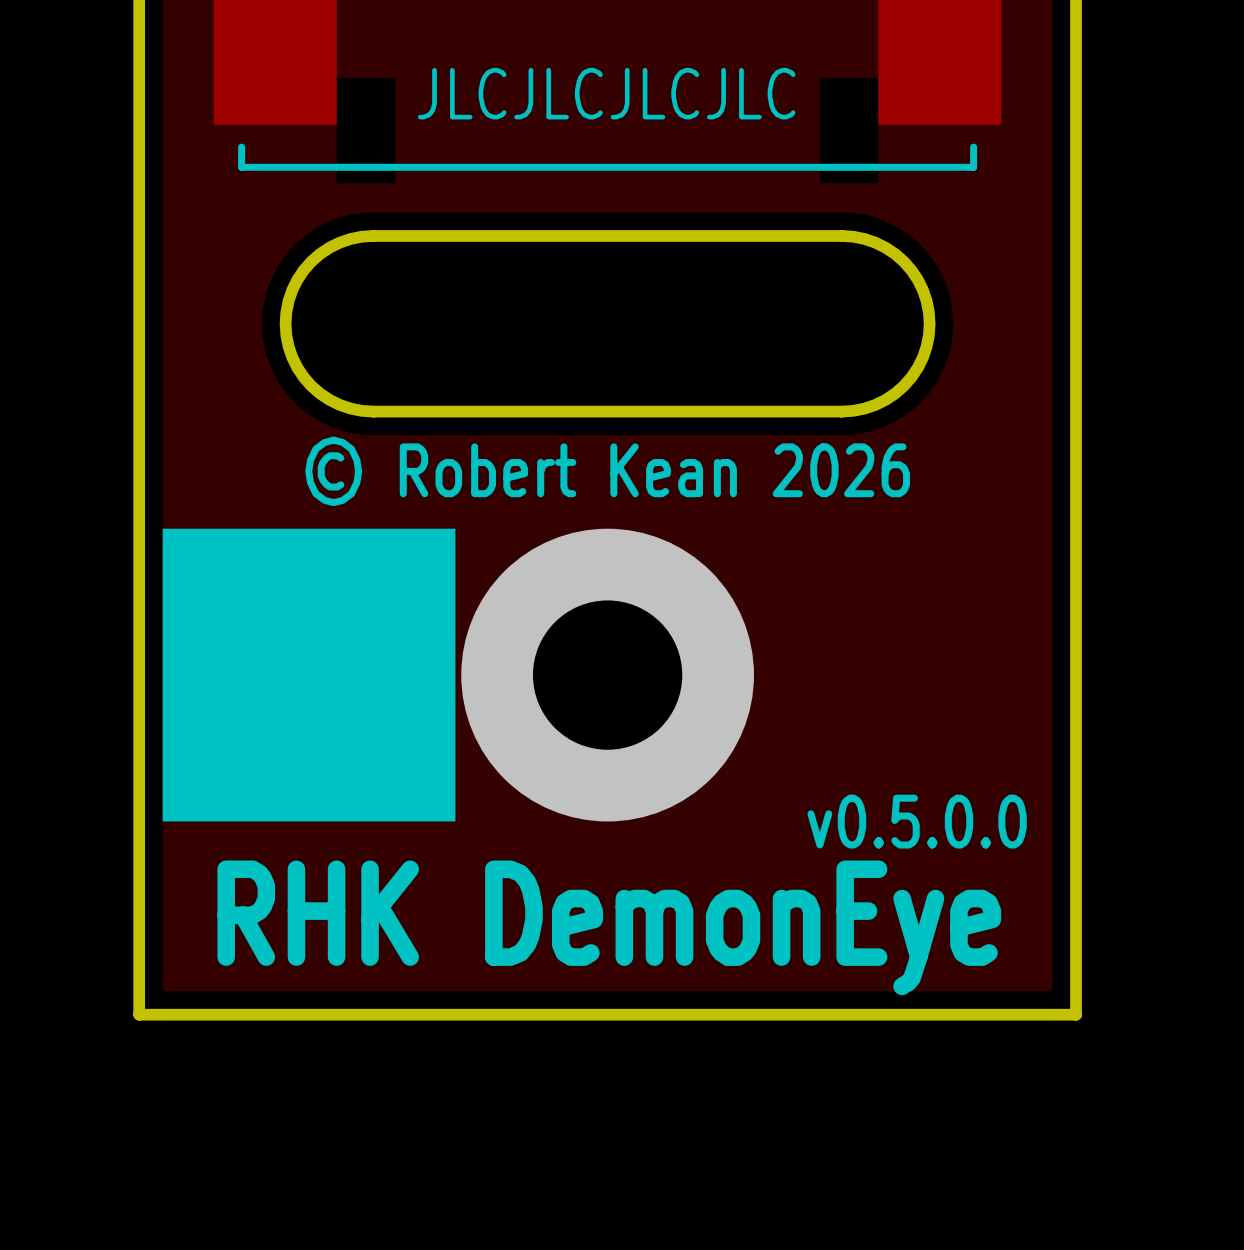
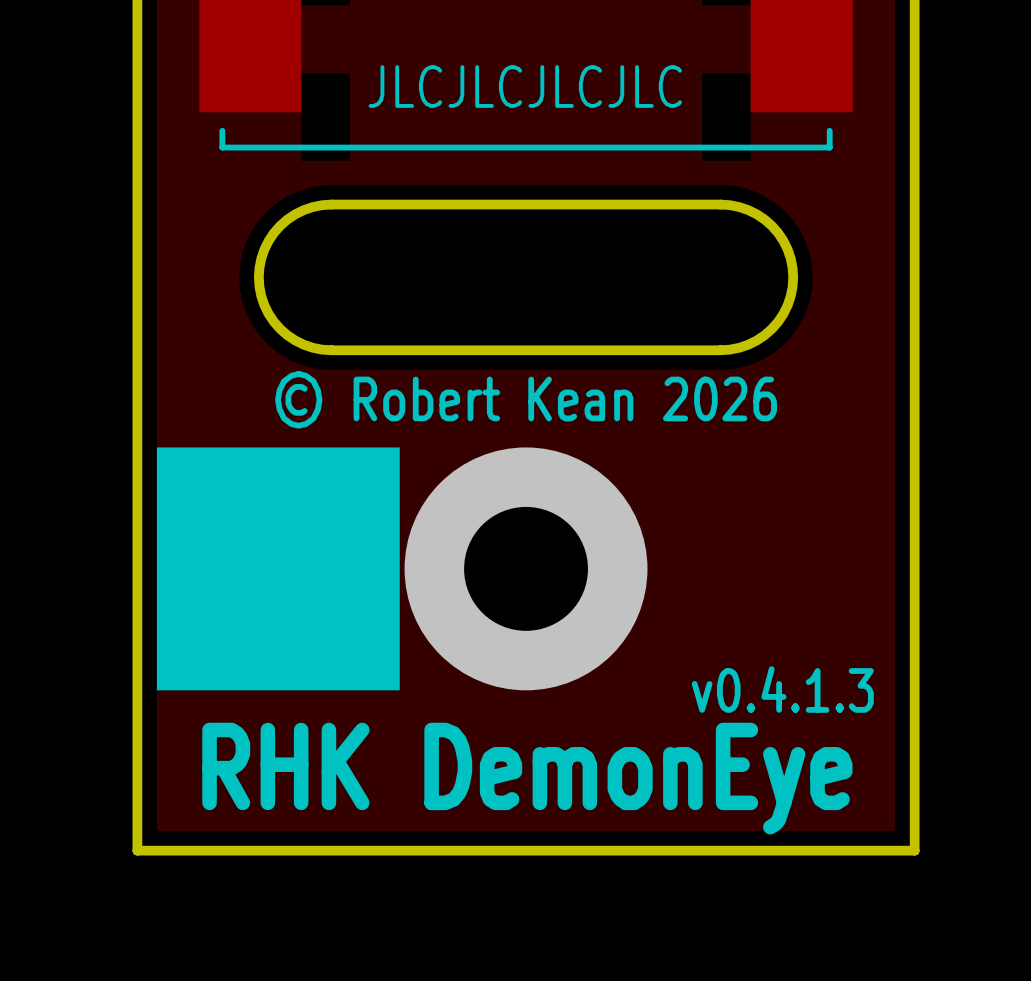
text: v0.5.0.0 (917, 821) -> v0.4.1.3 (782, 689)

